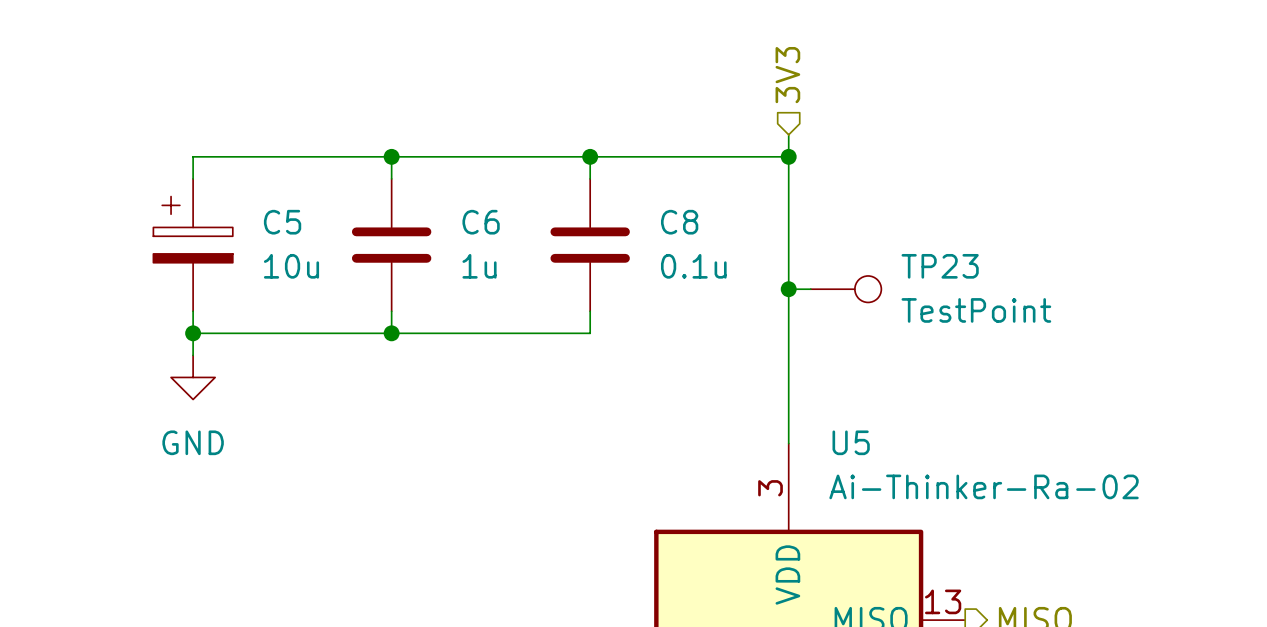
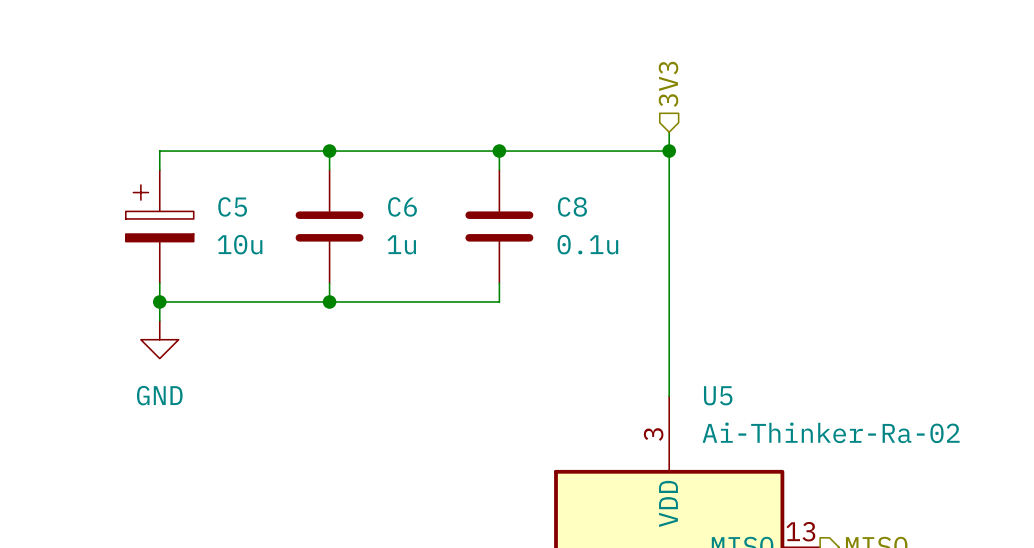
wire: (788, 289) (810, 289) -> none
junction: (788, 289) -> none
TP23: TestPoint (846, 289) -> none

